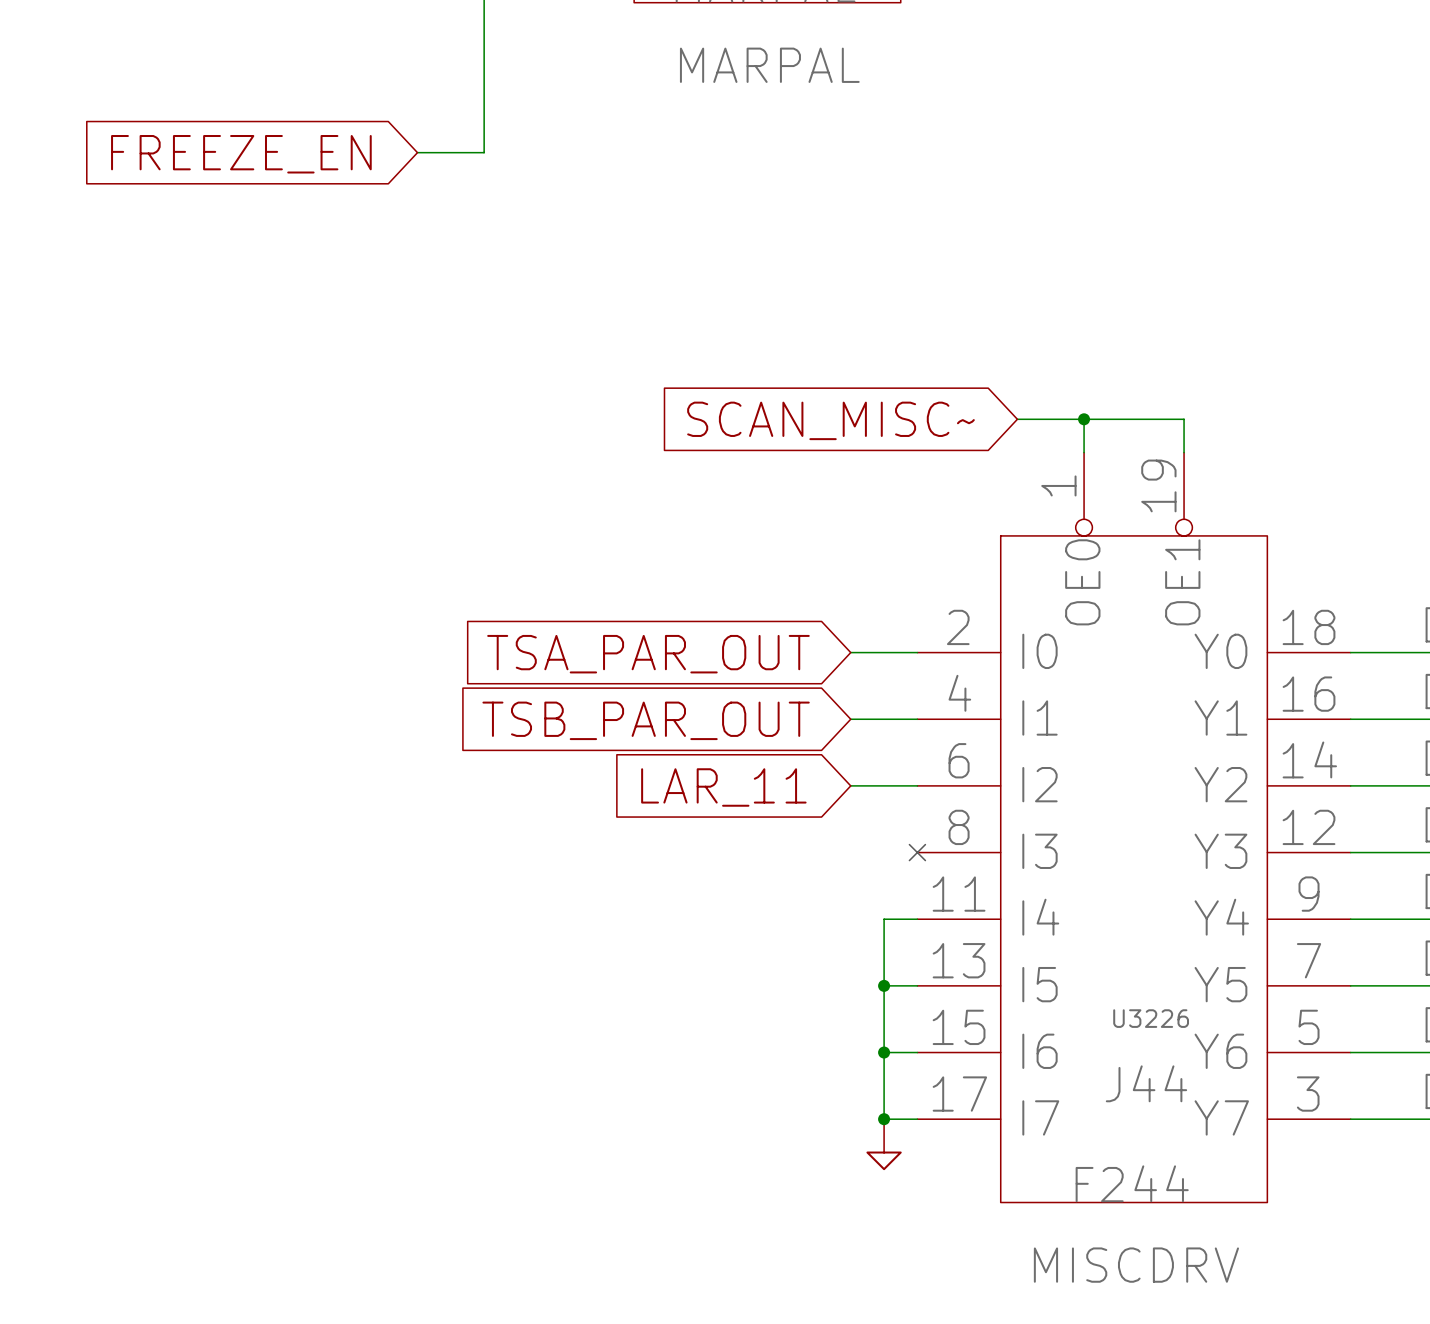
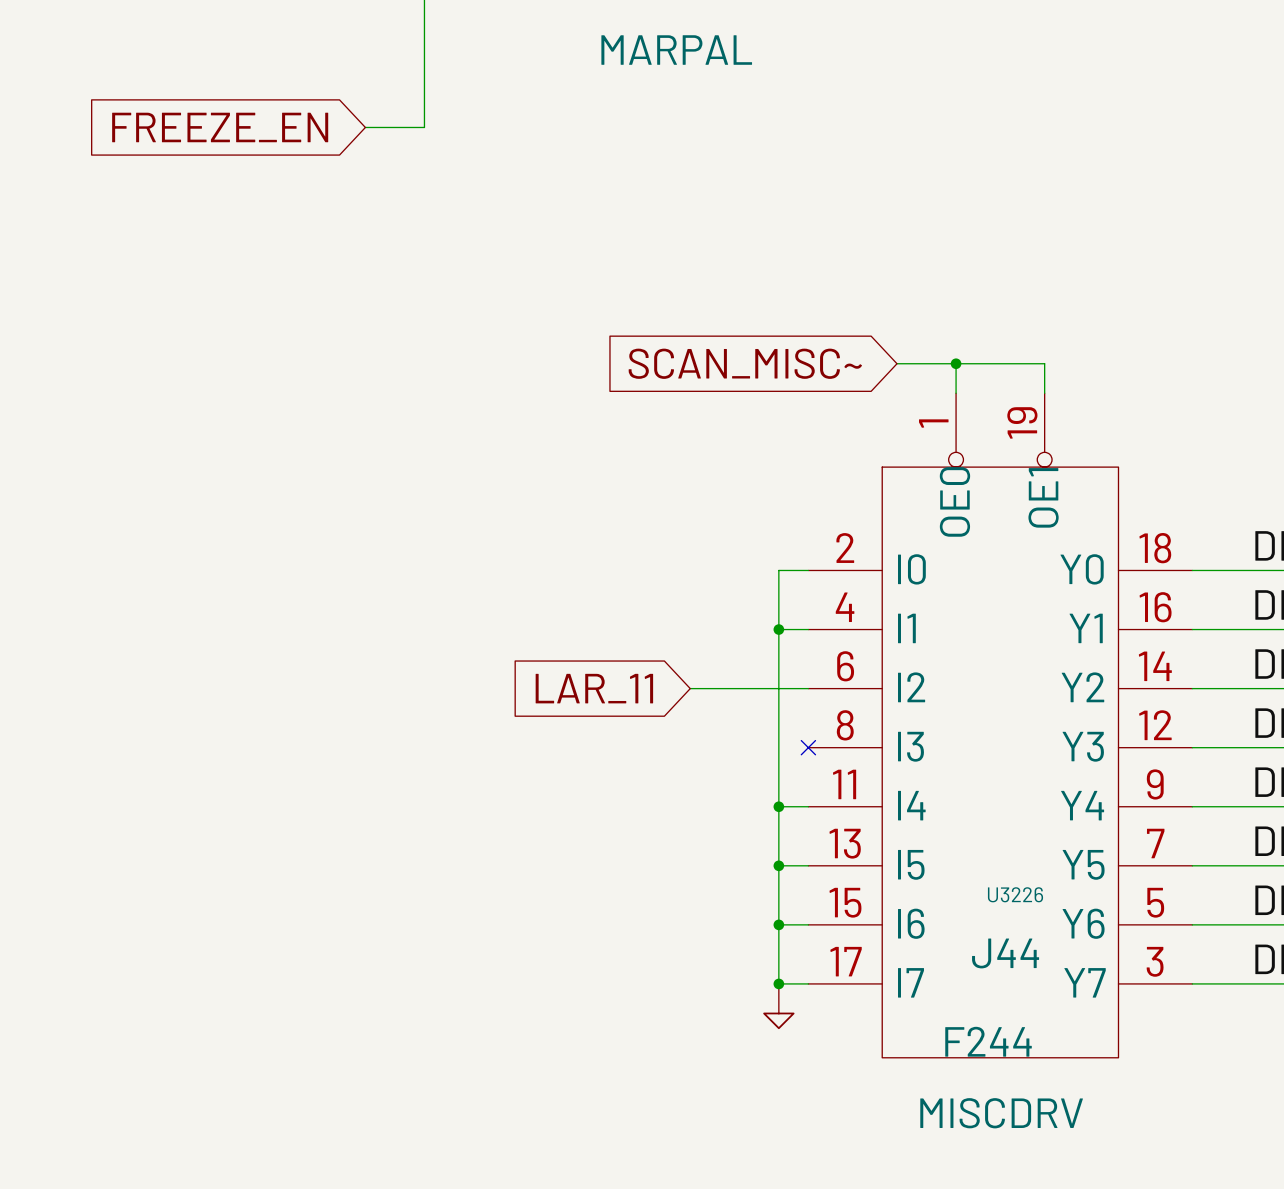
wire: (850, 652) (884, 652) -> (778, 806) (778, 570)
global label: TSA_PAR_OUT (648, 654) -> none
wire: (850, 719) (884, 719) -> none
junction: none -> (778, 629)
global label: TSB_PAR_OUT (646, 720) -> none
wire: none -> (690, 688) (749, 688)
global label position: LAR_11 (723, 787) -> LAR_11 (594, 688)
junction: none -> (778, 806)

